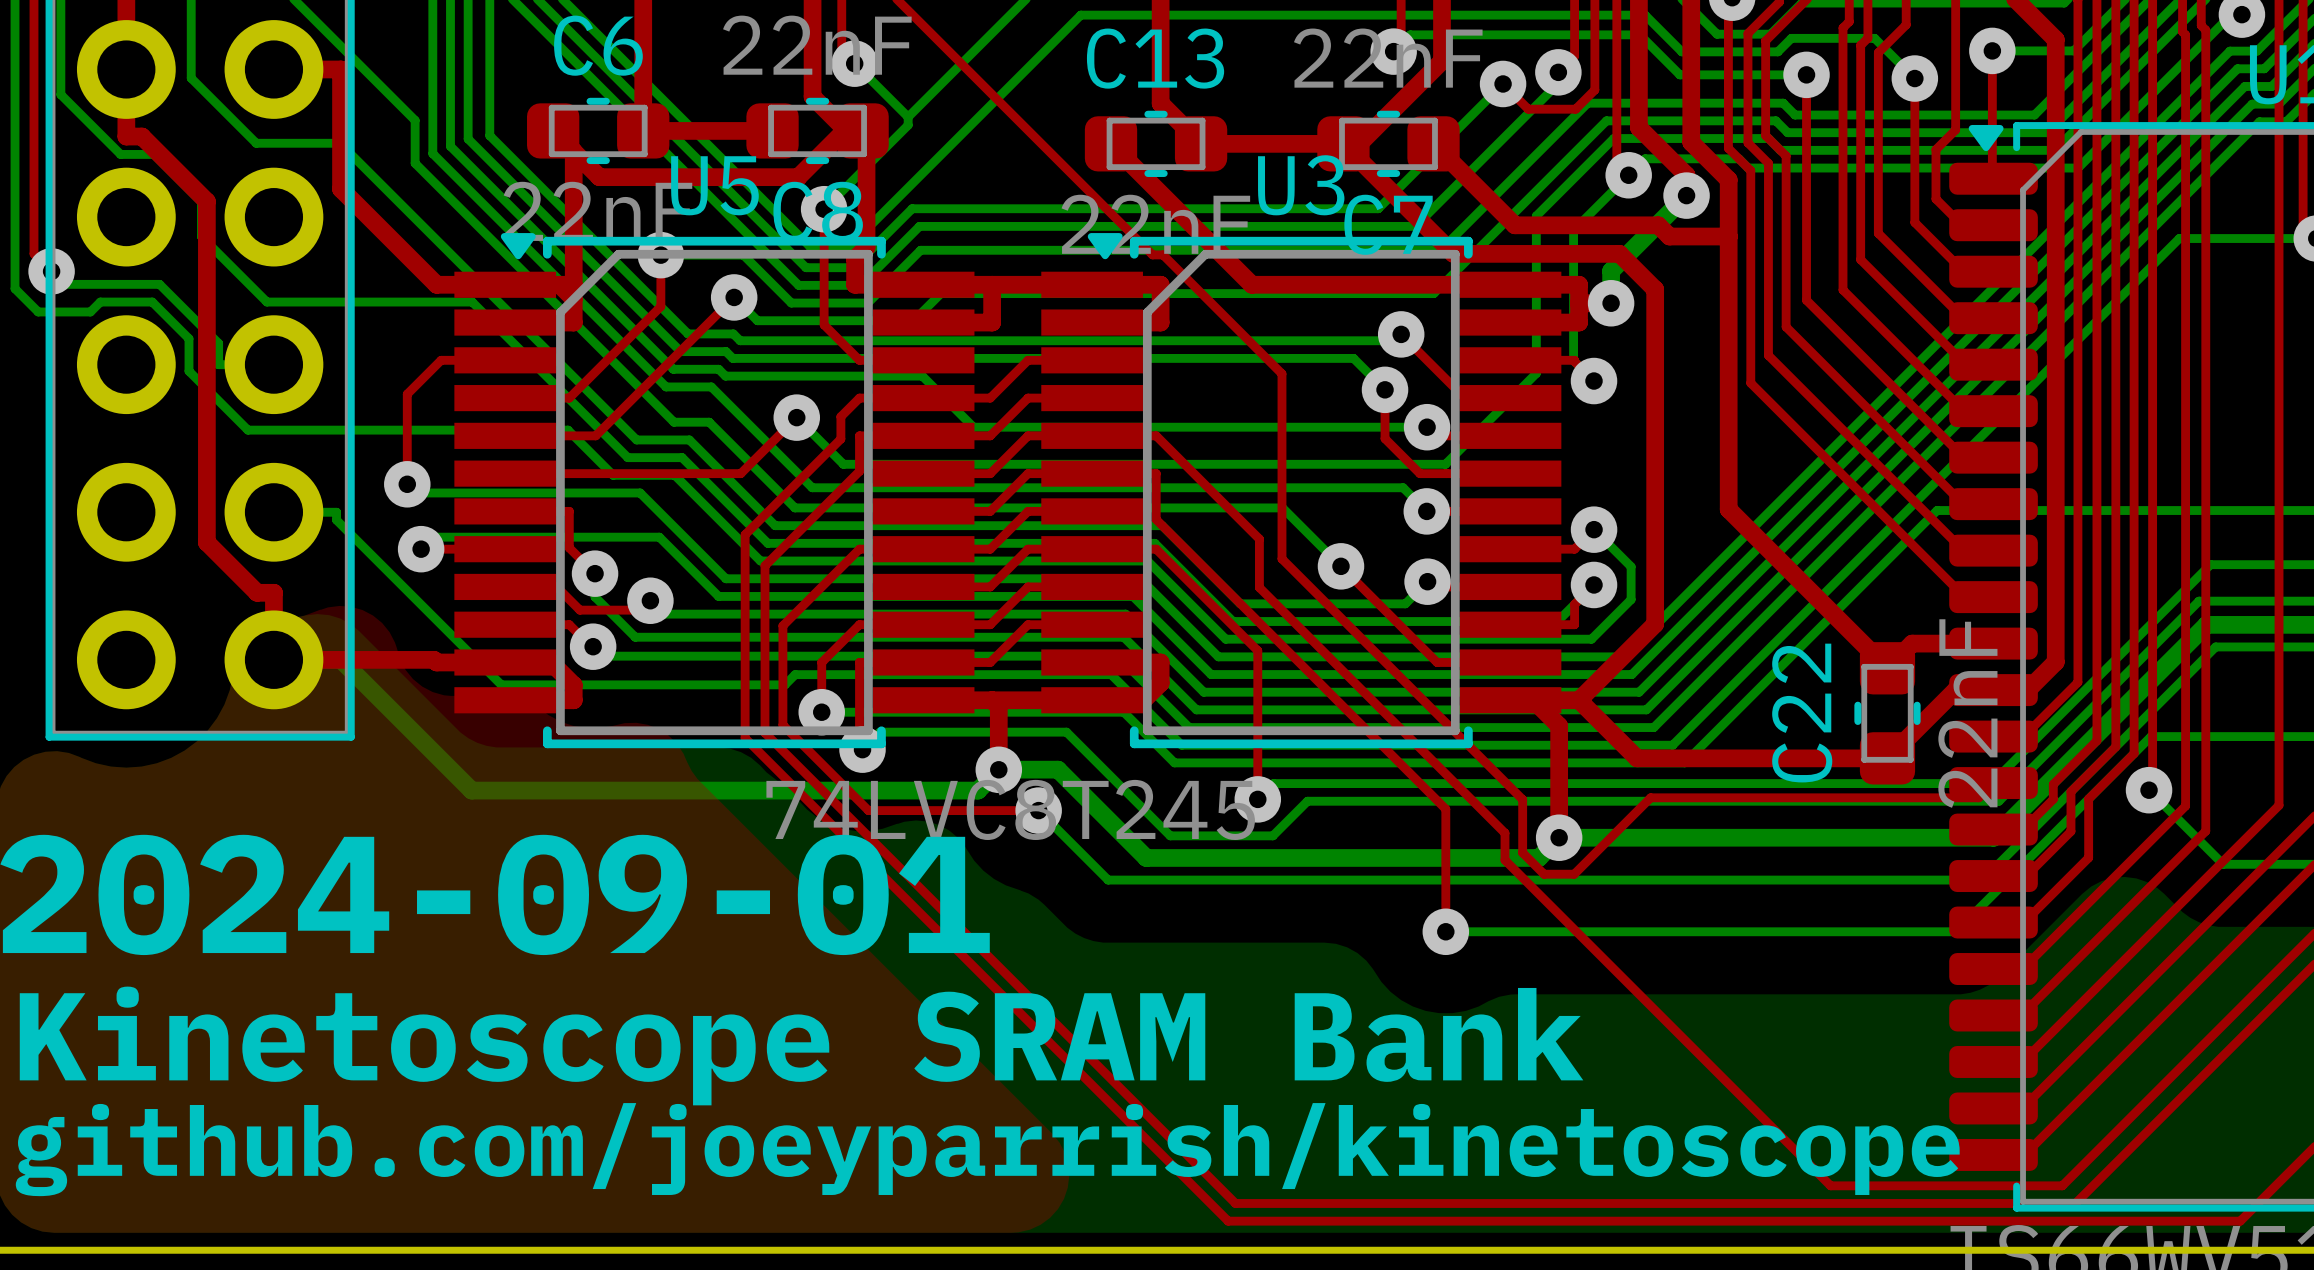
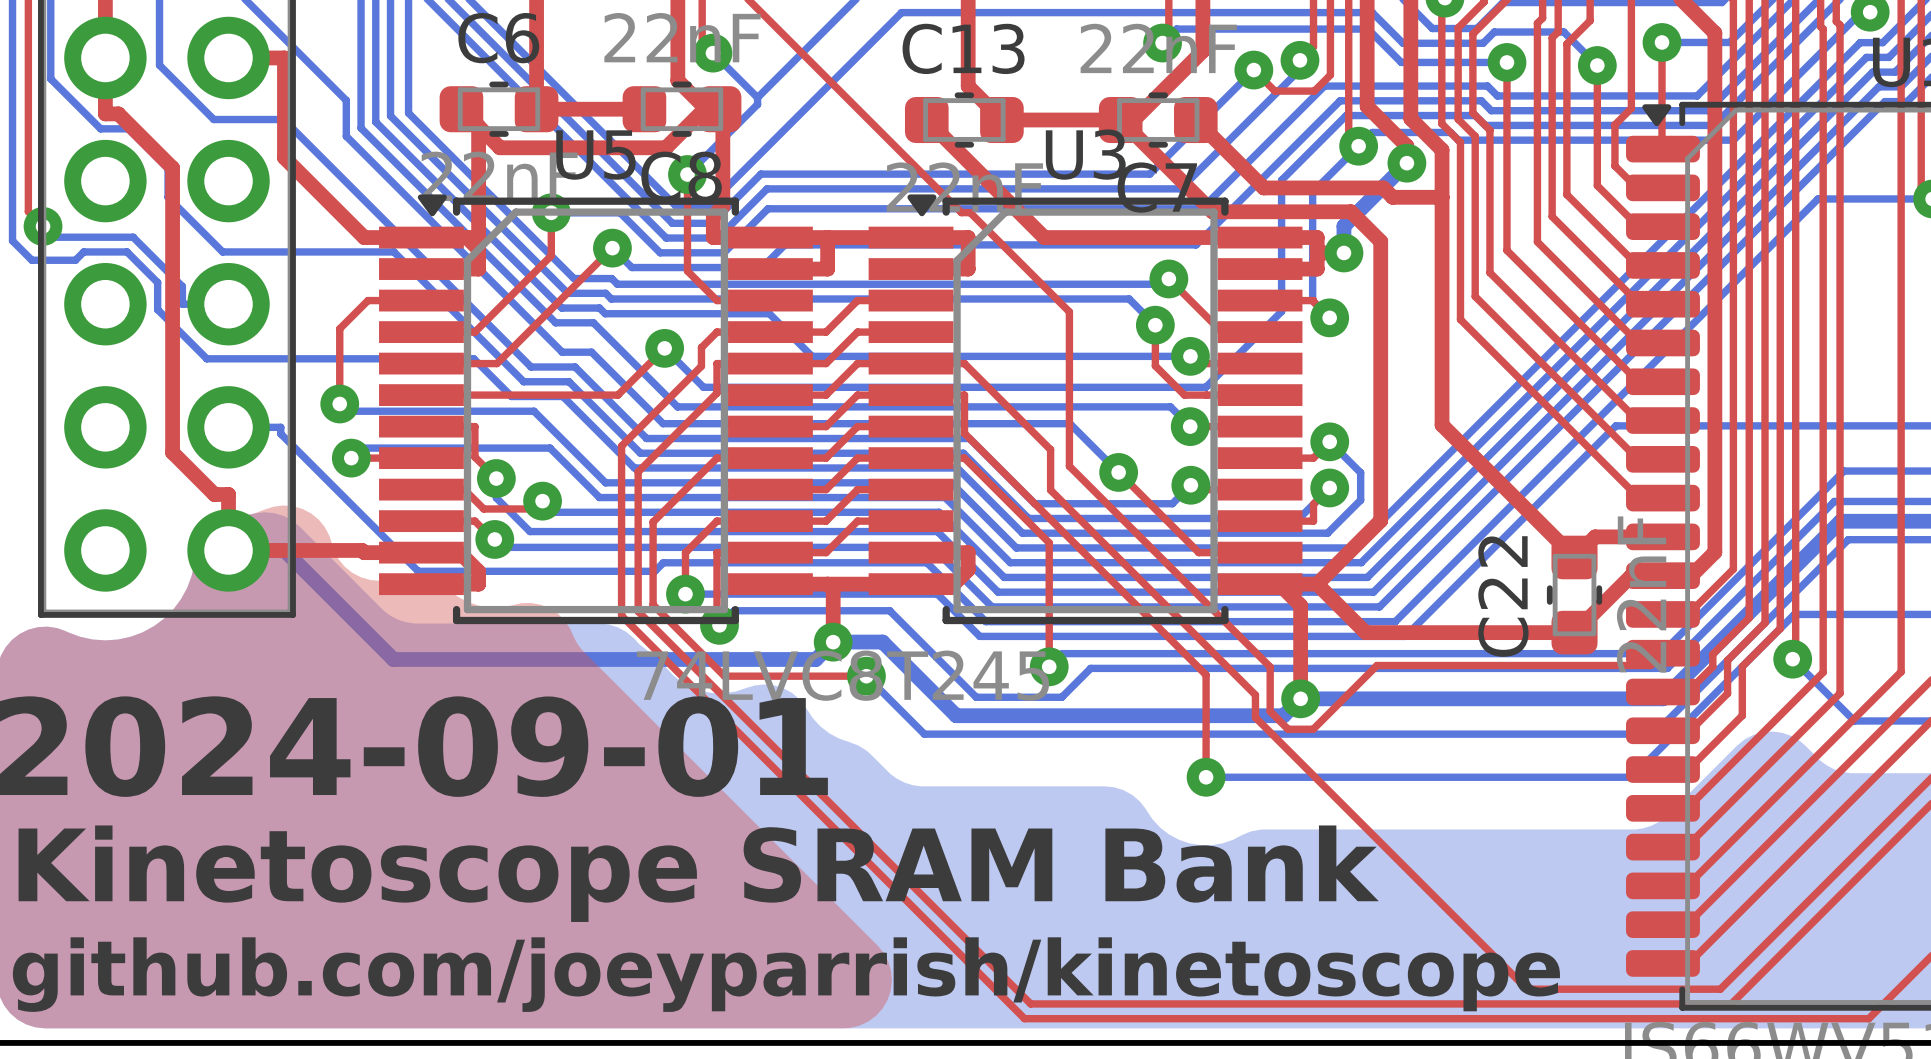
text position: github.com/joeyparrish/kinetoscope (987, 1149) -> github.com/joeyparrish/kinetoscope (786, 974)

